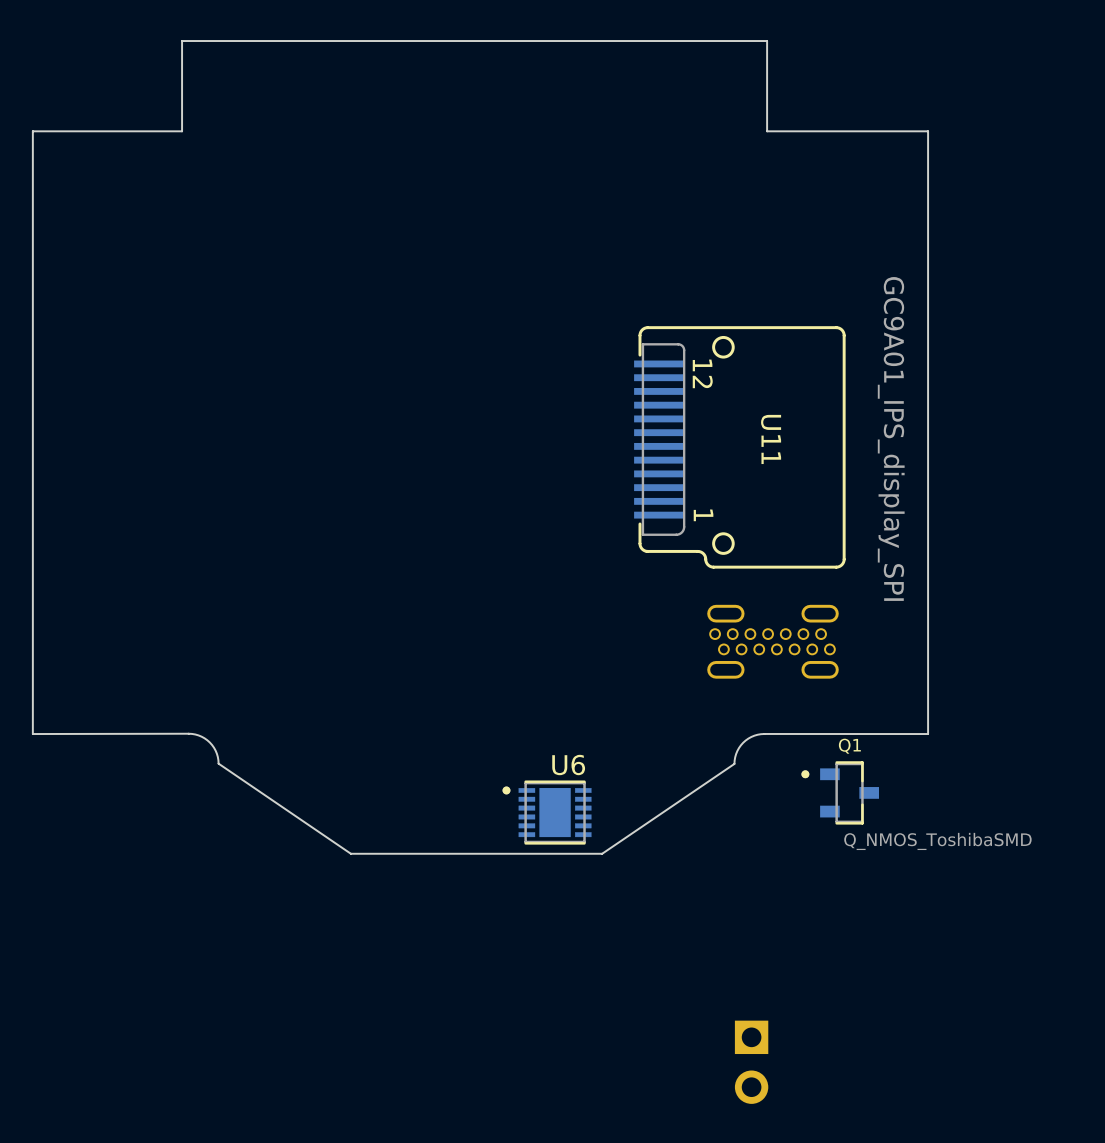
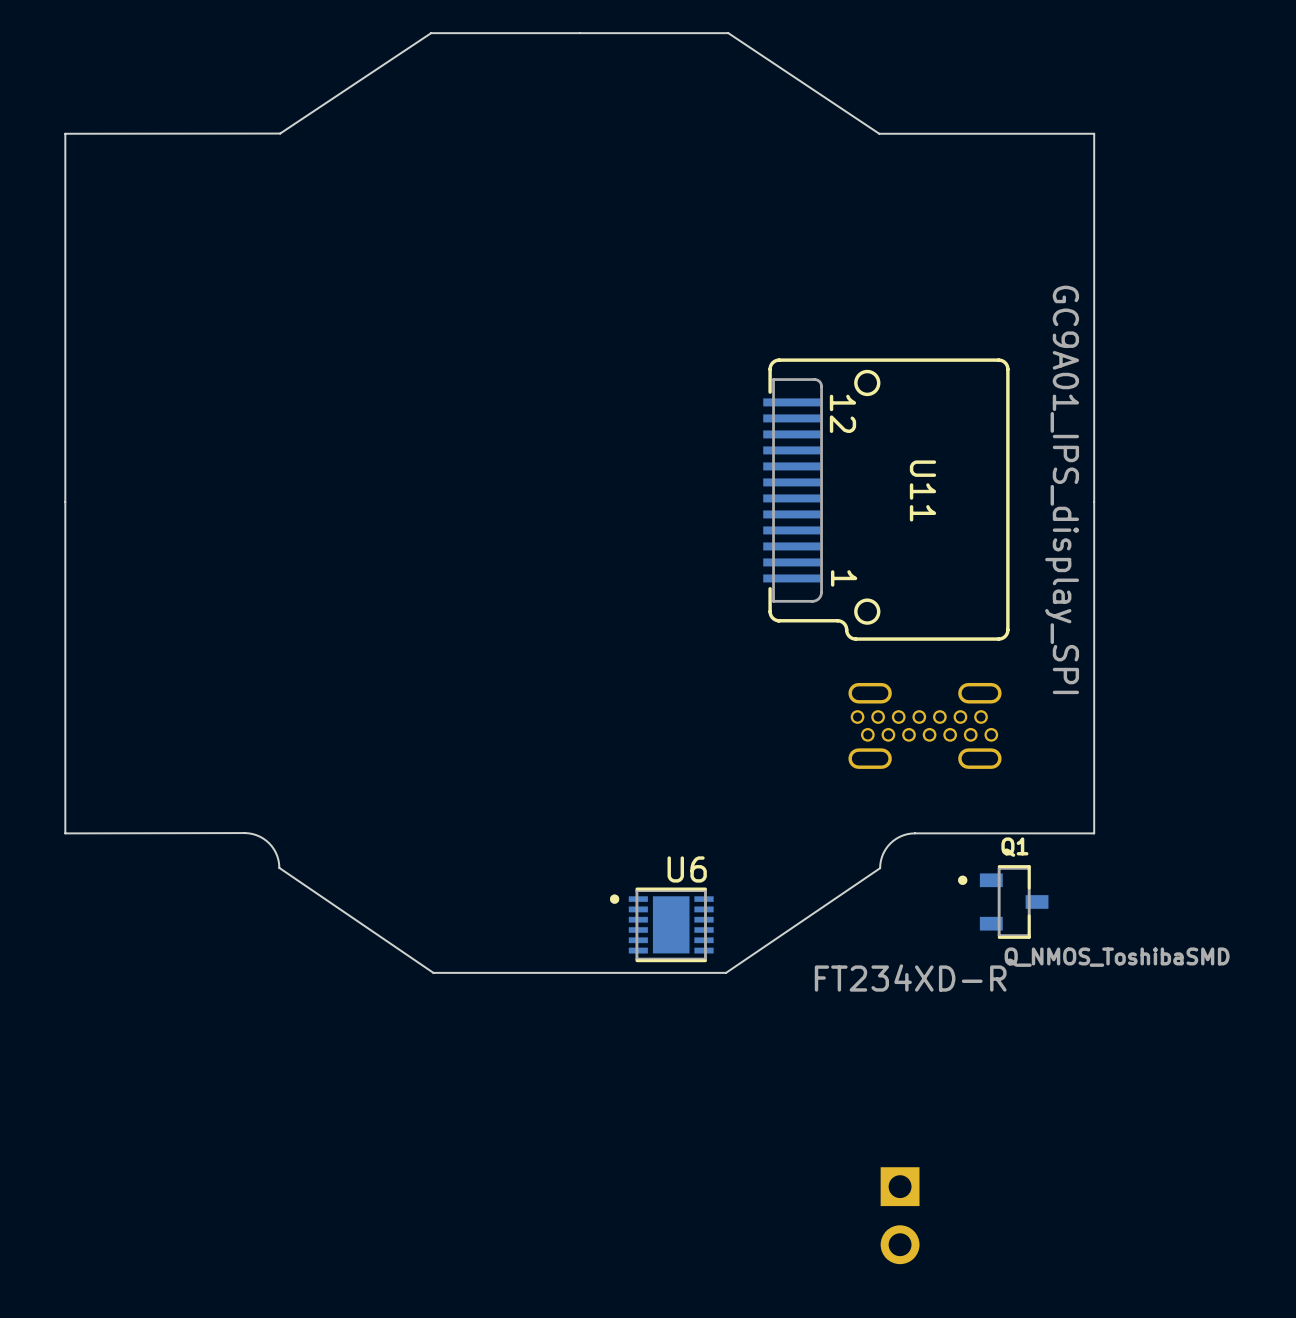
board edge: (918, 734) (928, 734) (928, 131) (767, 131) (767, 41) (182, 41) (182, 131) (32, 131) (32, 734) (34, 734) -> (1094, 833) (1094, 133) (879, 133) (728, 33) (431, 33) (280, 133) (65, 133) (65, 833)
U6 value: none -> FT234XD-R (910, 977)

